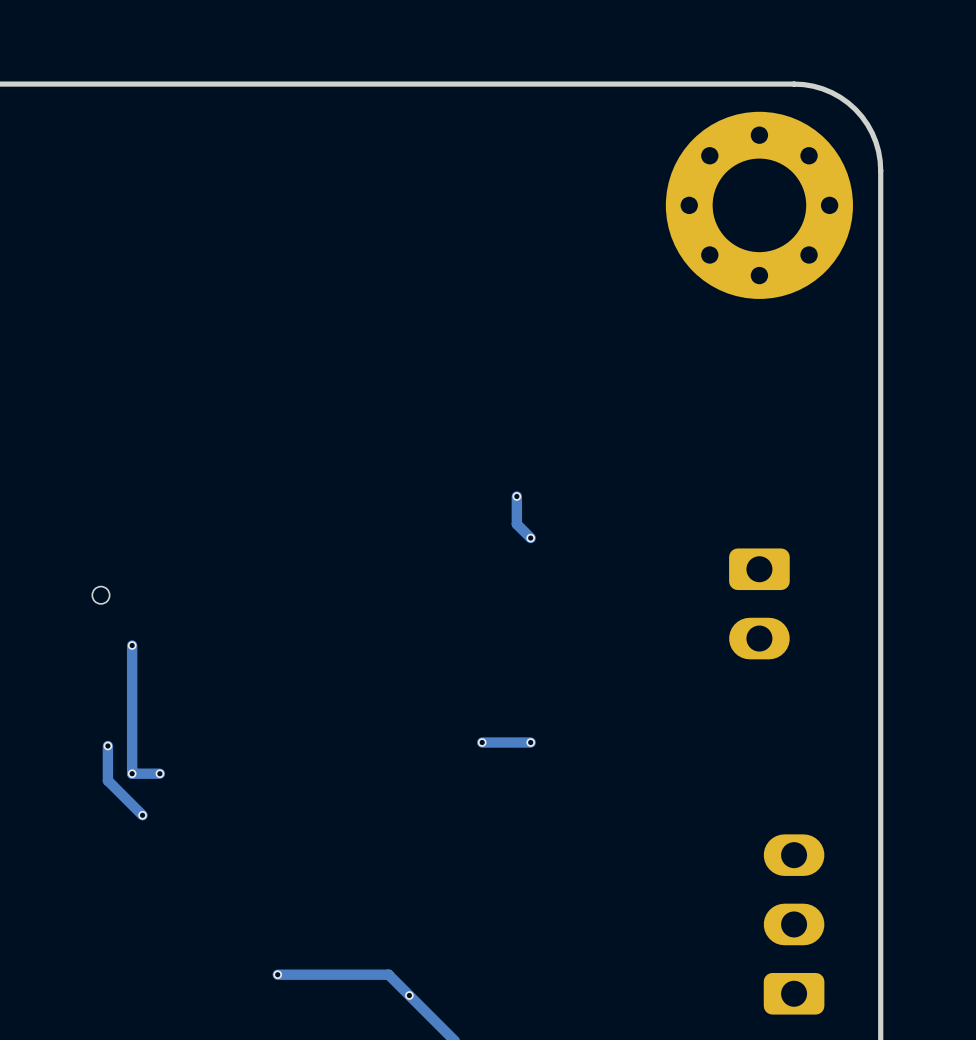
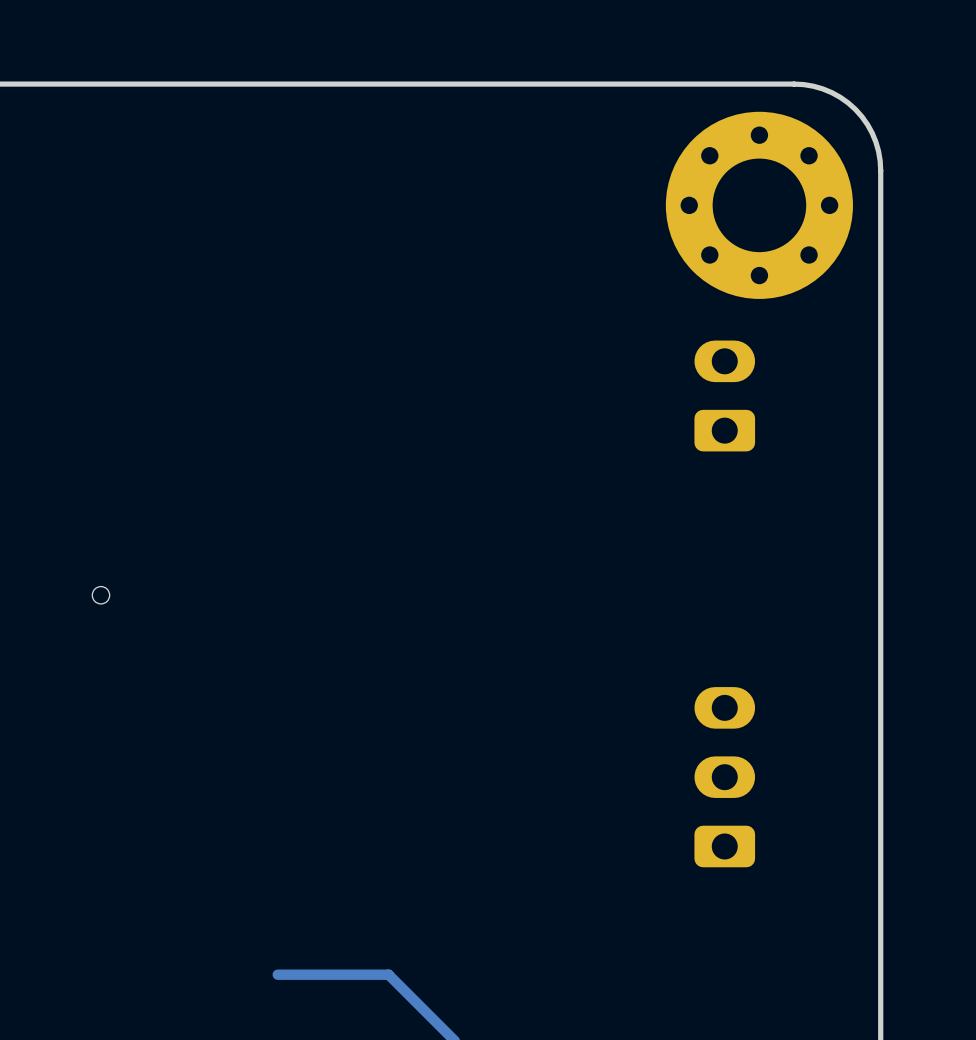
track: (516, 496) (516, 524) (530, 538) -> none
via: (516, 496) -> none
via: (530, 538) -> none
part rotation: 0° (759, 603) -> 180° (724, 395)
part position: (759, 603) -> (724, 395)
track: (132, 645) (132, 773) (159, 773) -> none
via: (132, 645) -> none
via: (482, 742) -> none
track: (530, 742) (482, 742) -> none
via: (530, 742) -> none
track: (107, 745) (107, 780) (142, 815) -> none
via: (107, 745) -> none
via: (132, 773) -> none
via: (159, 773) -> none
via: (142, 815) -> none
part position: (794, 924) -> (724, 777)
via: (277, 974) -> none
via: (409, 995) -> none

